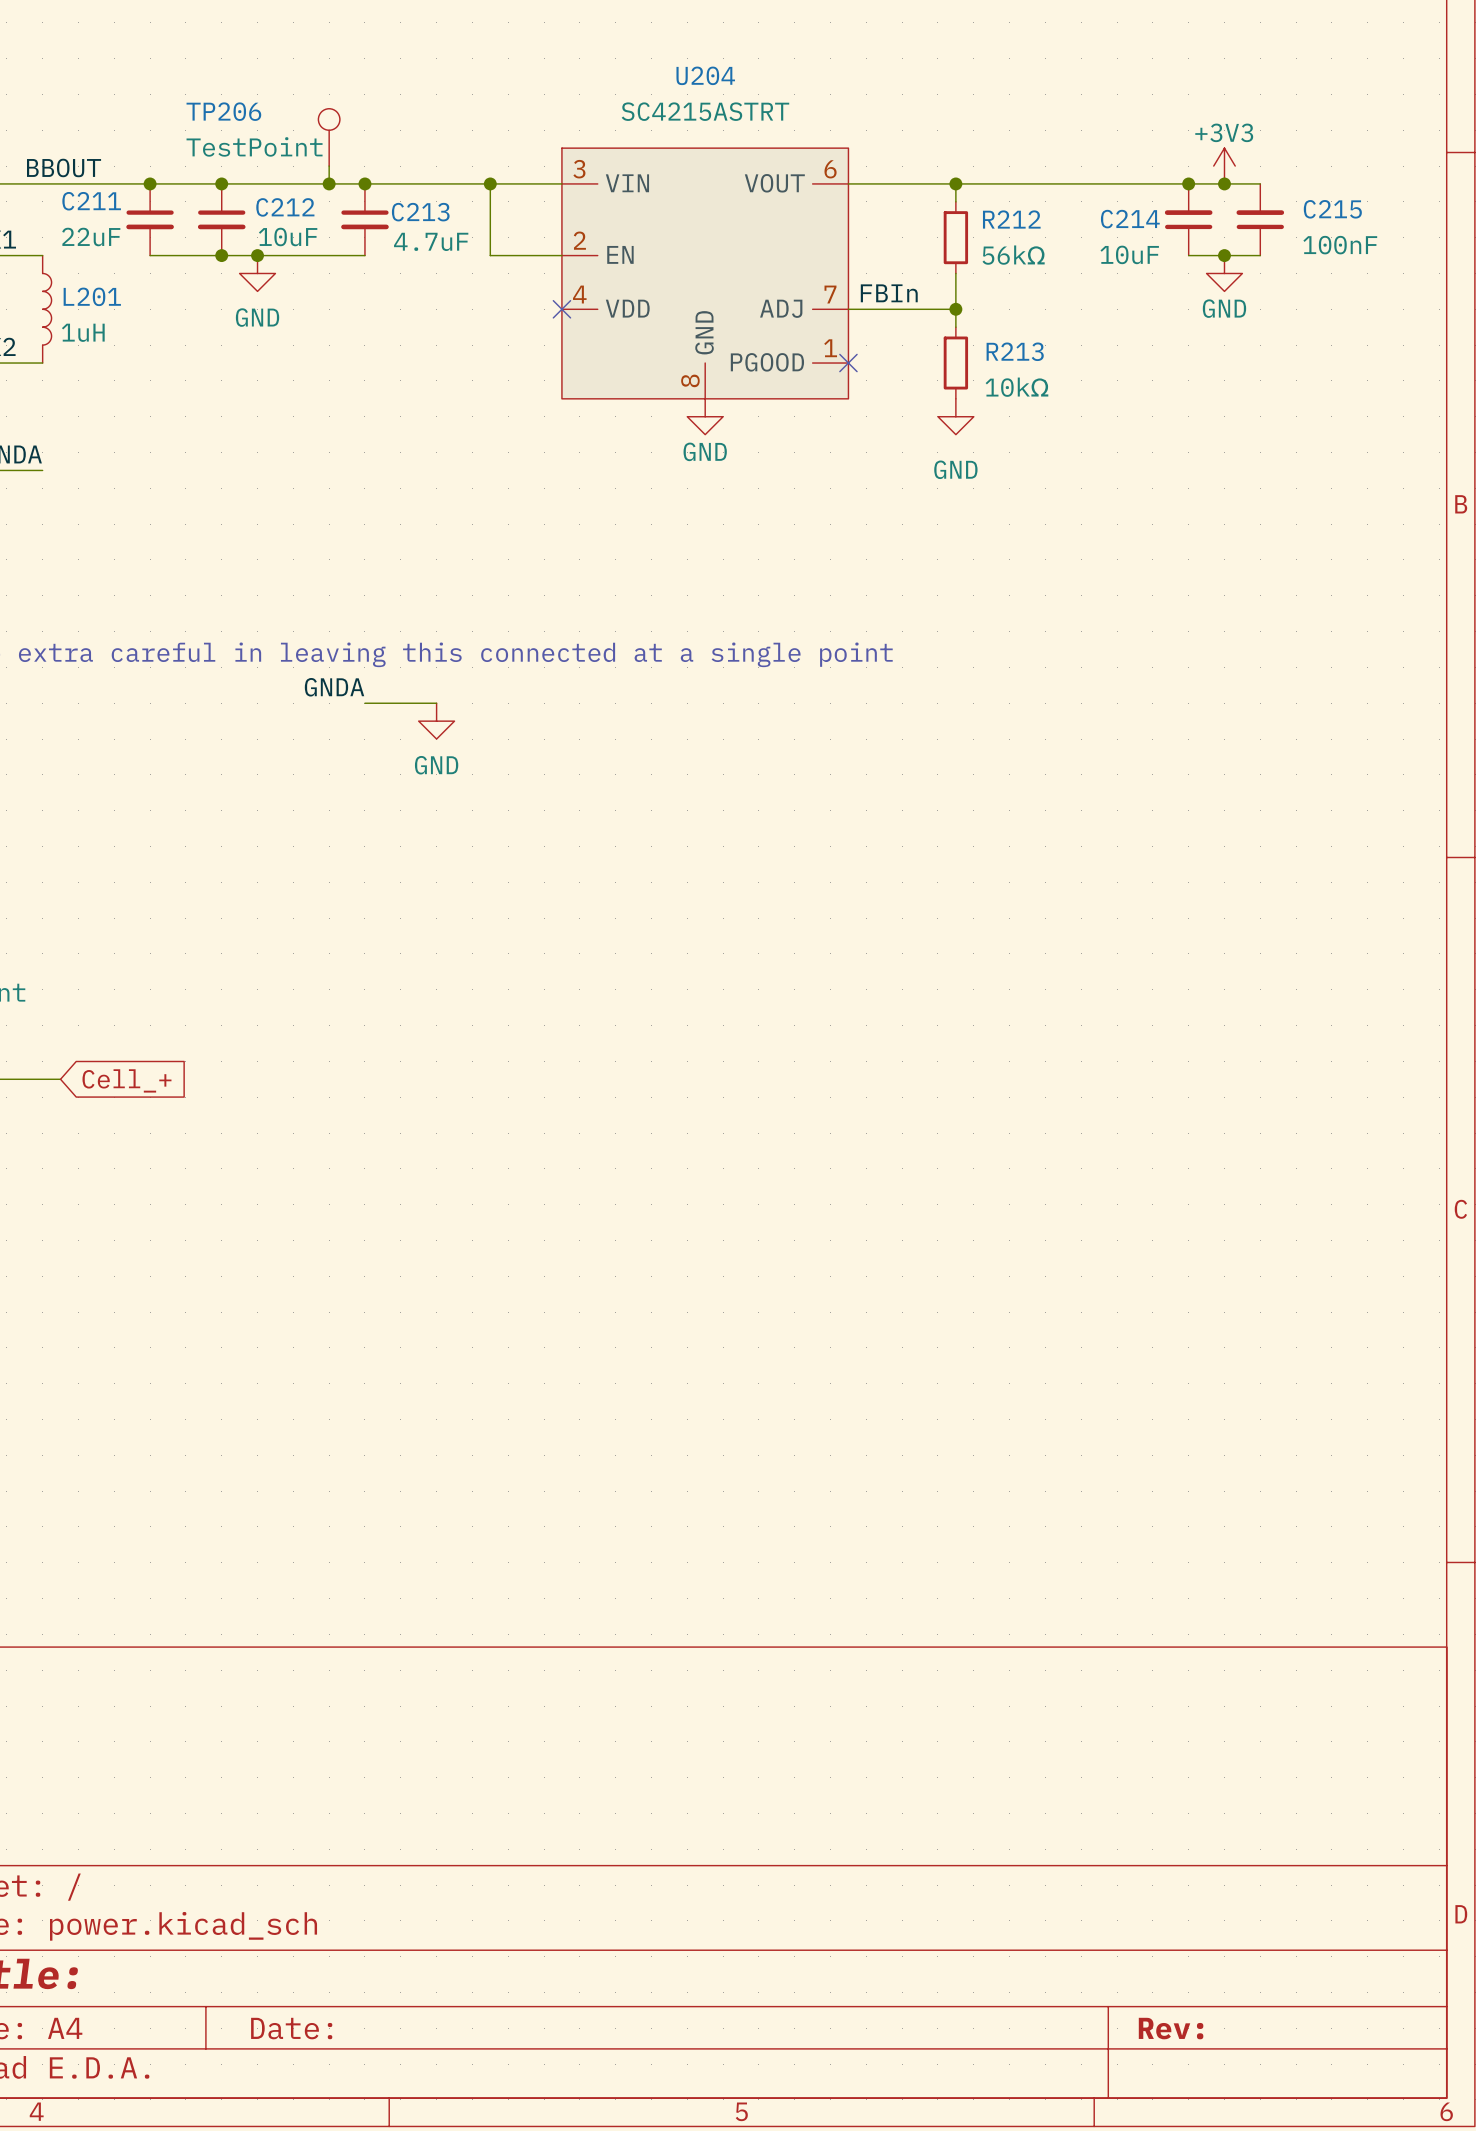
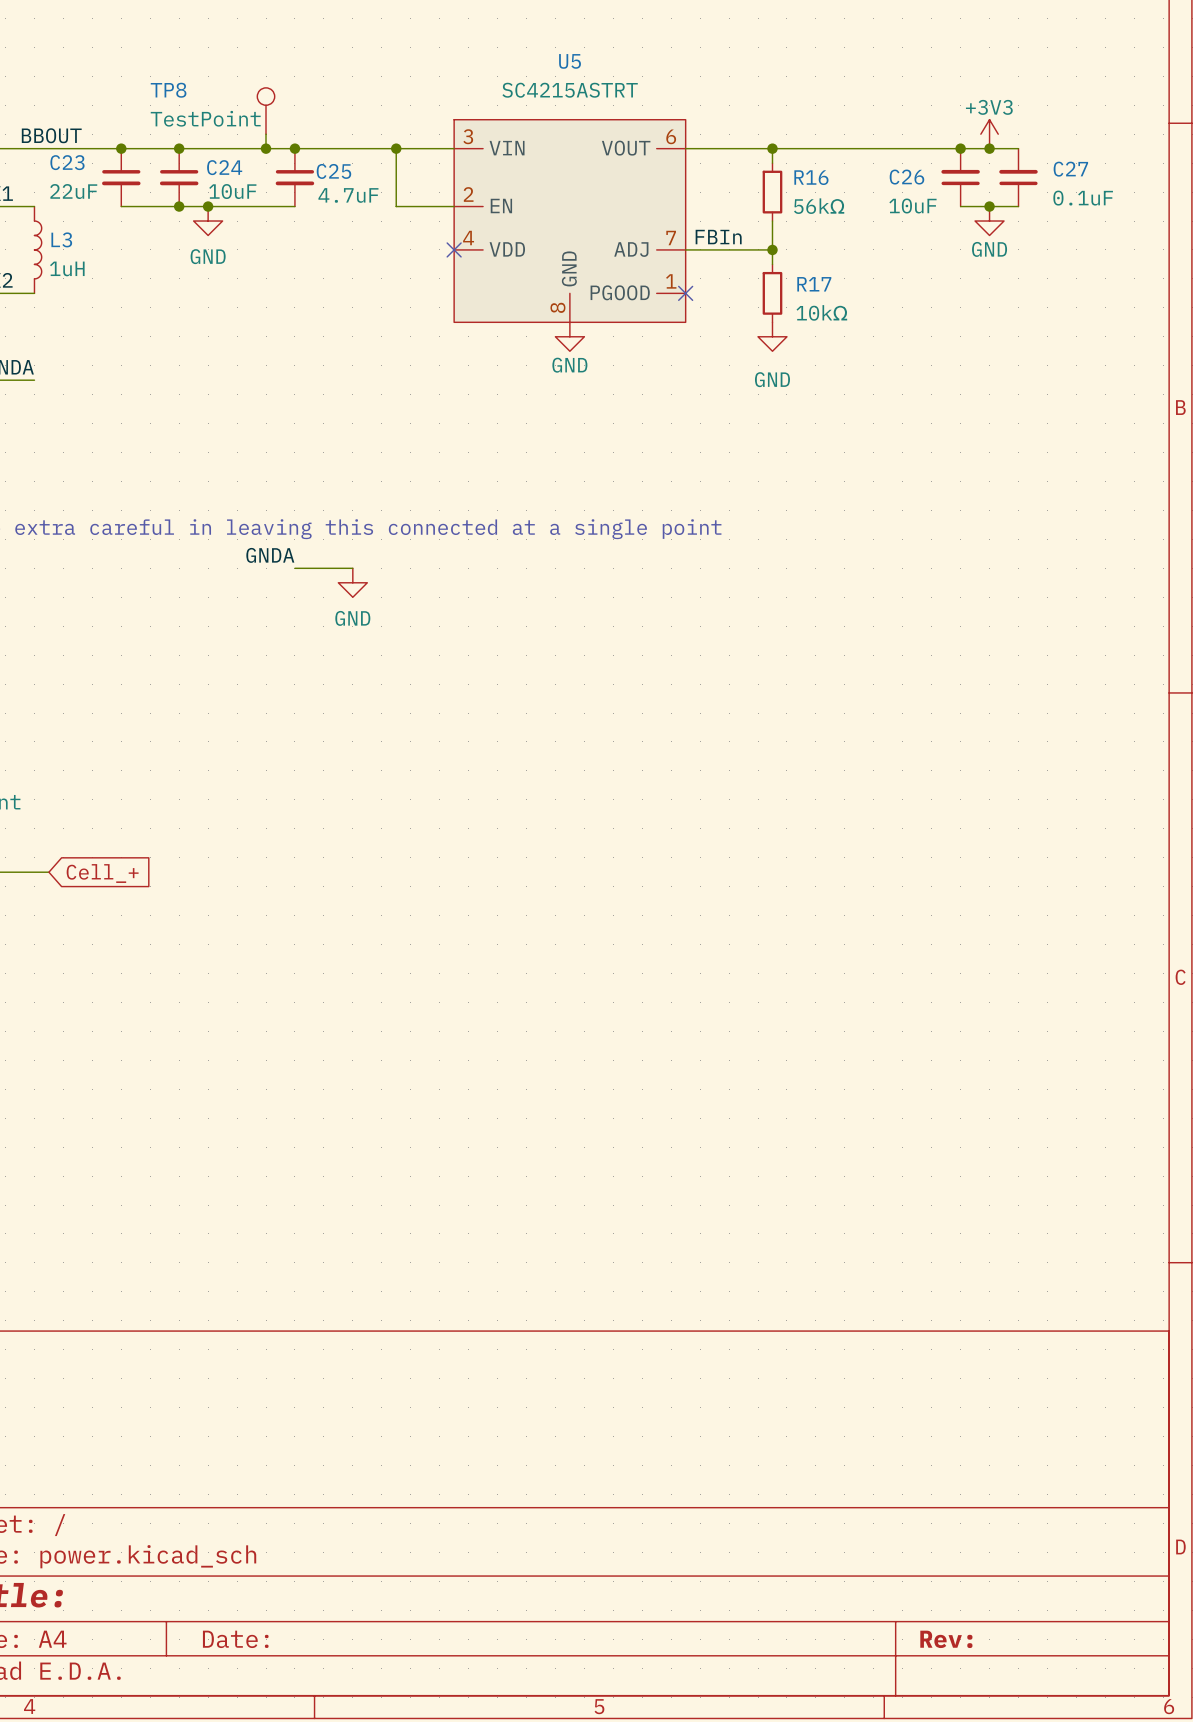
U204 name: U204 (705, 75) -> U5 (570, 61)
TP206 name: TP206 (223, 111) -> TP8 (168, 90)
C211 name: C211 (91, 201) -> C23 (67, 162)
C212 name: C212 (285, 207) -> C24 (224, 167)
C215 name: C215 (1332, 209) -> C27 (1070, 169)
C213 name: C213 (420, 212) -> C25 (333, 171)
R212 name: R212 (1011, 219) -> R16 (811, 177)
C214 name: C214 (1130, 219) -> C26 (906, 177)
C215 value: 100nF (1340, 245) -> 0.1uF (1083, 198)
L201 name: L201 (92, 296) -> L3 (61, 239)
R213 name: R213 (1015, 351) -> R17 (814, 284)

